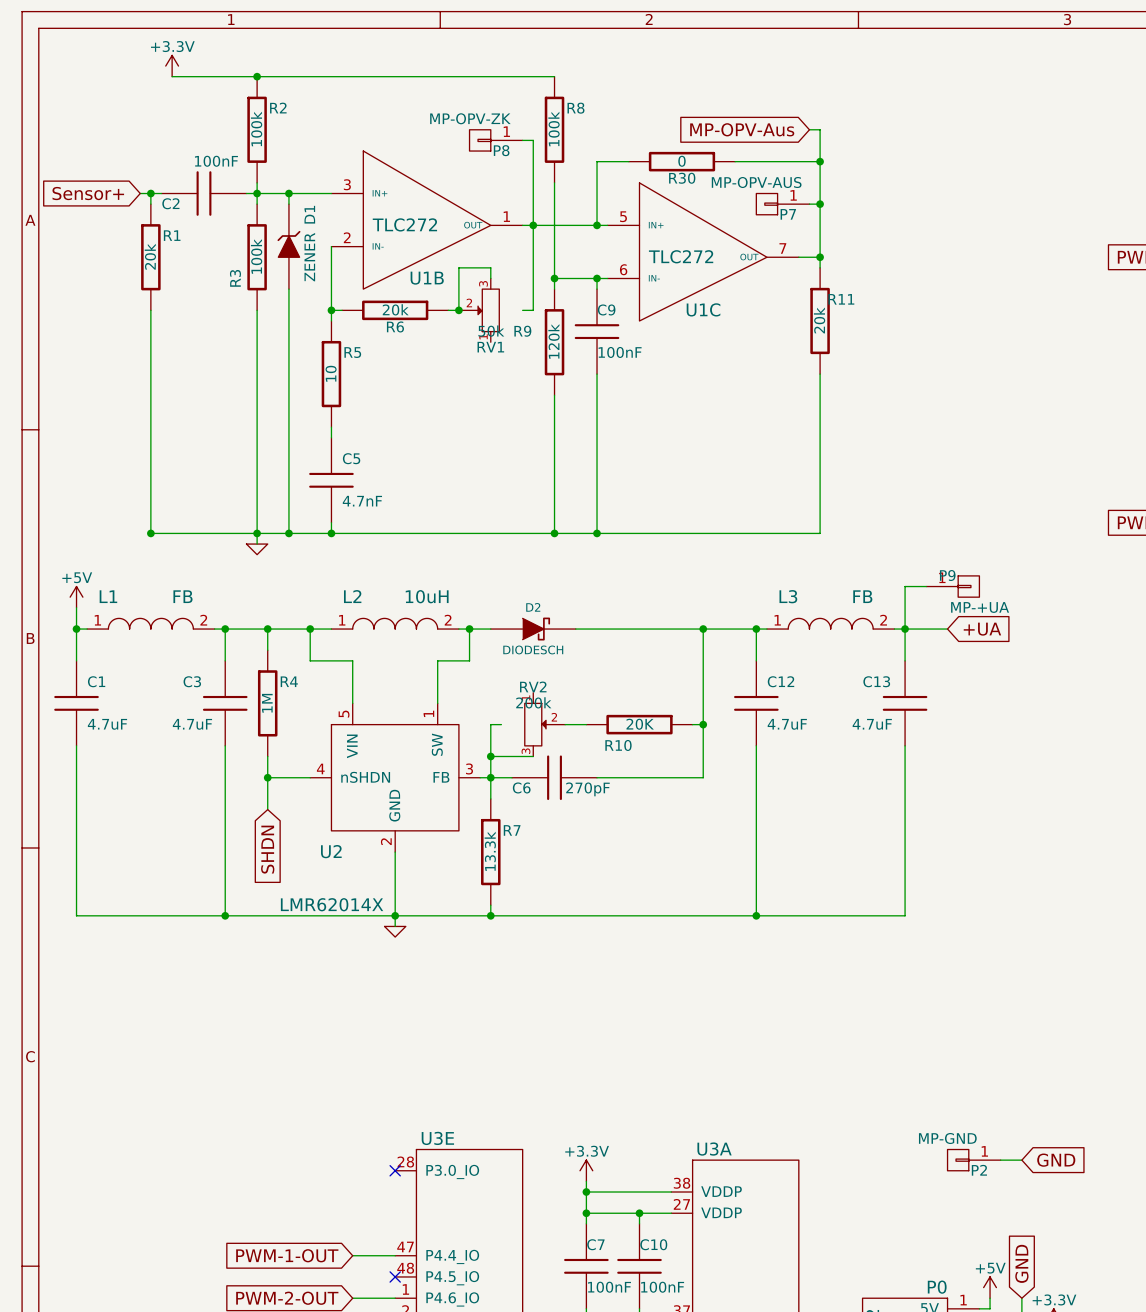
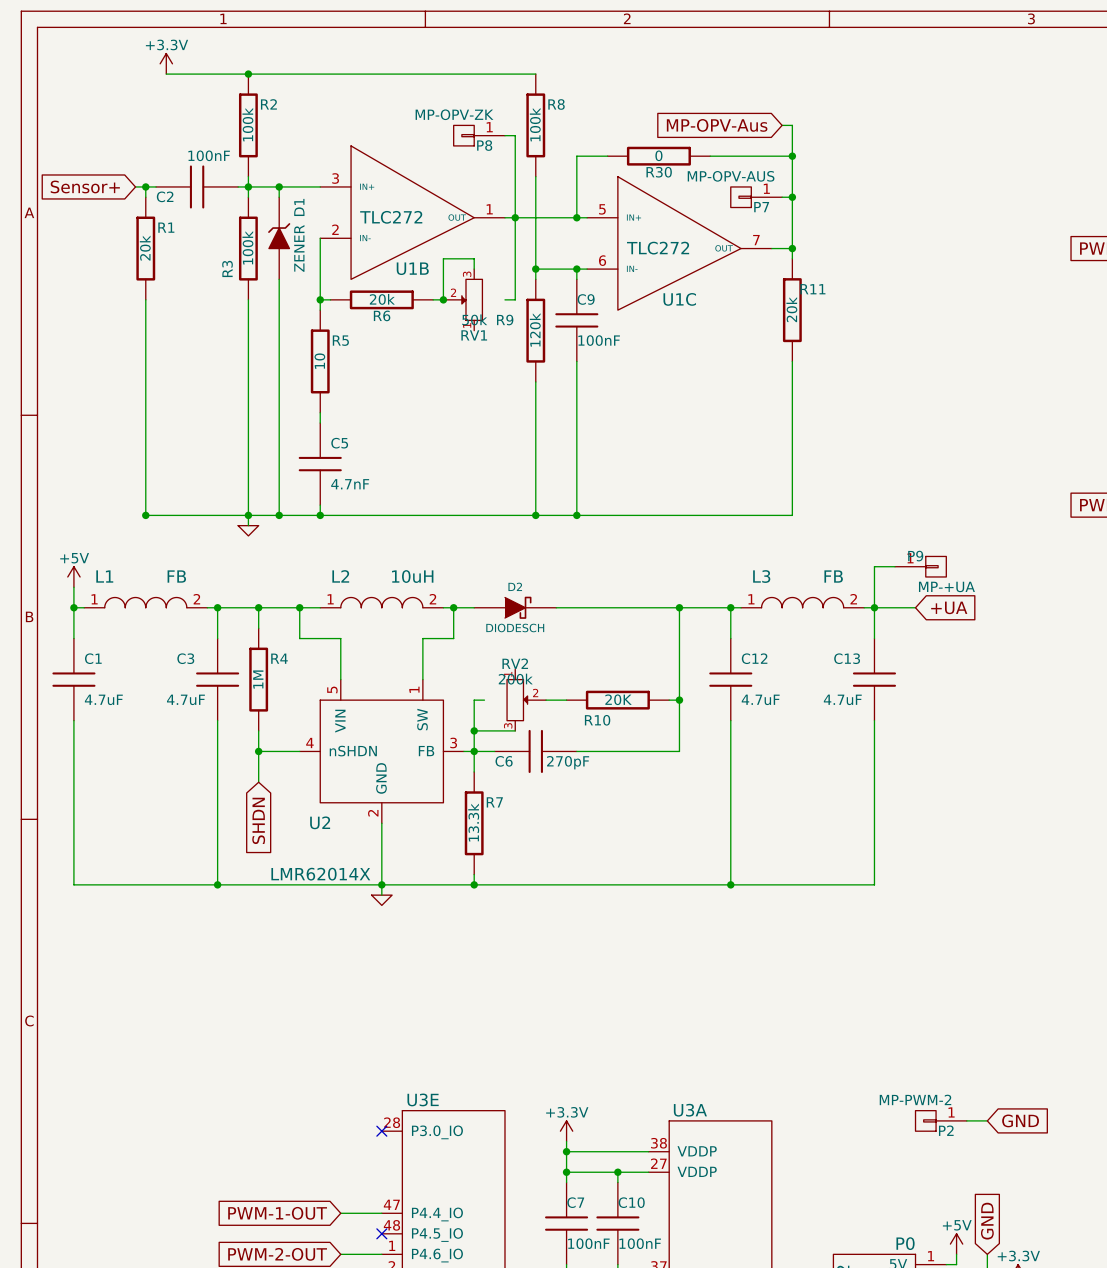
P2 value: MP-GND (947, 1138) -> MP-PWM-2 (915, 1099)

